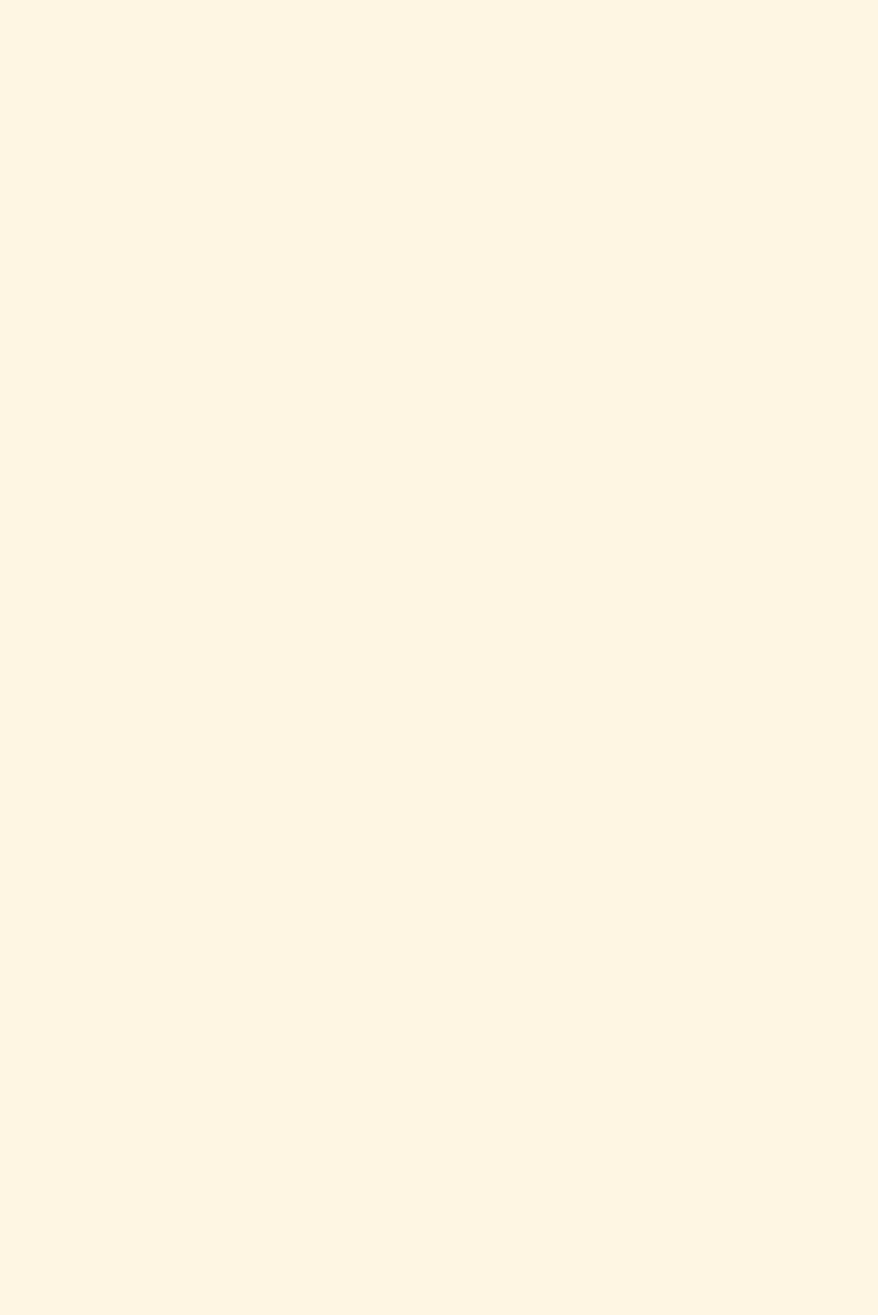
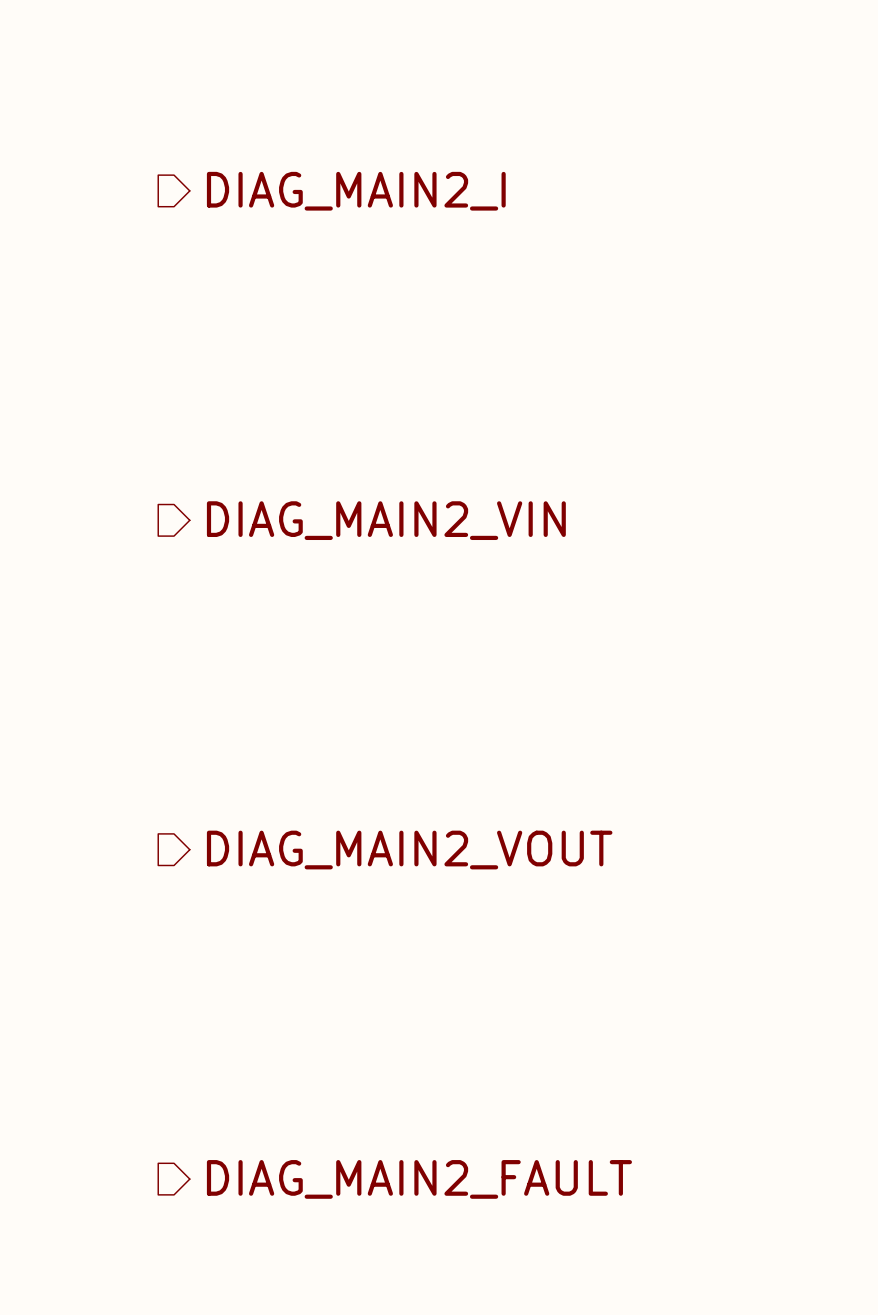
hierarchical label: none -> DIAG_MAIN2_I (356, 191)
hierarchical label: none -> DIAG_MAIN2_VIN (386, 520)
hierarchical label: none -> DIAG_MAIN2_VOUT (409, 850)
hierarchical label: none -> DIAG_MAIN2_FAULT (419, 1179)

